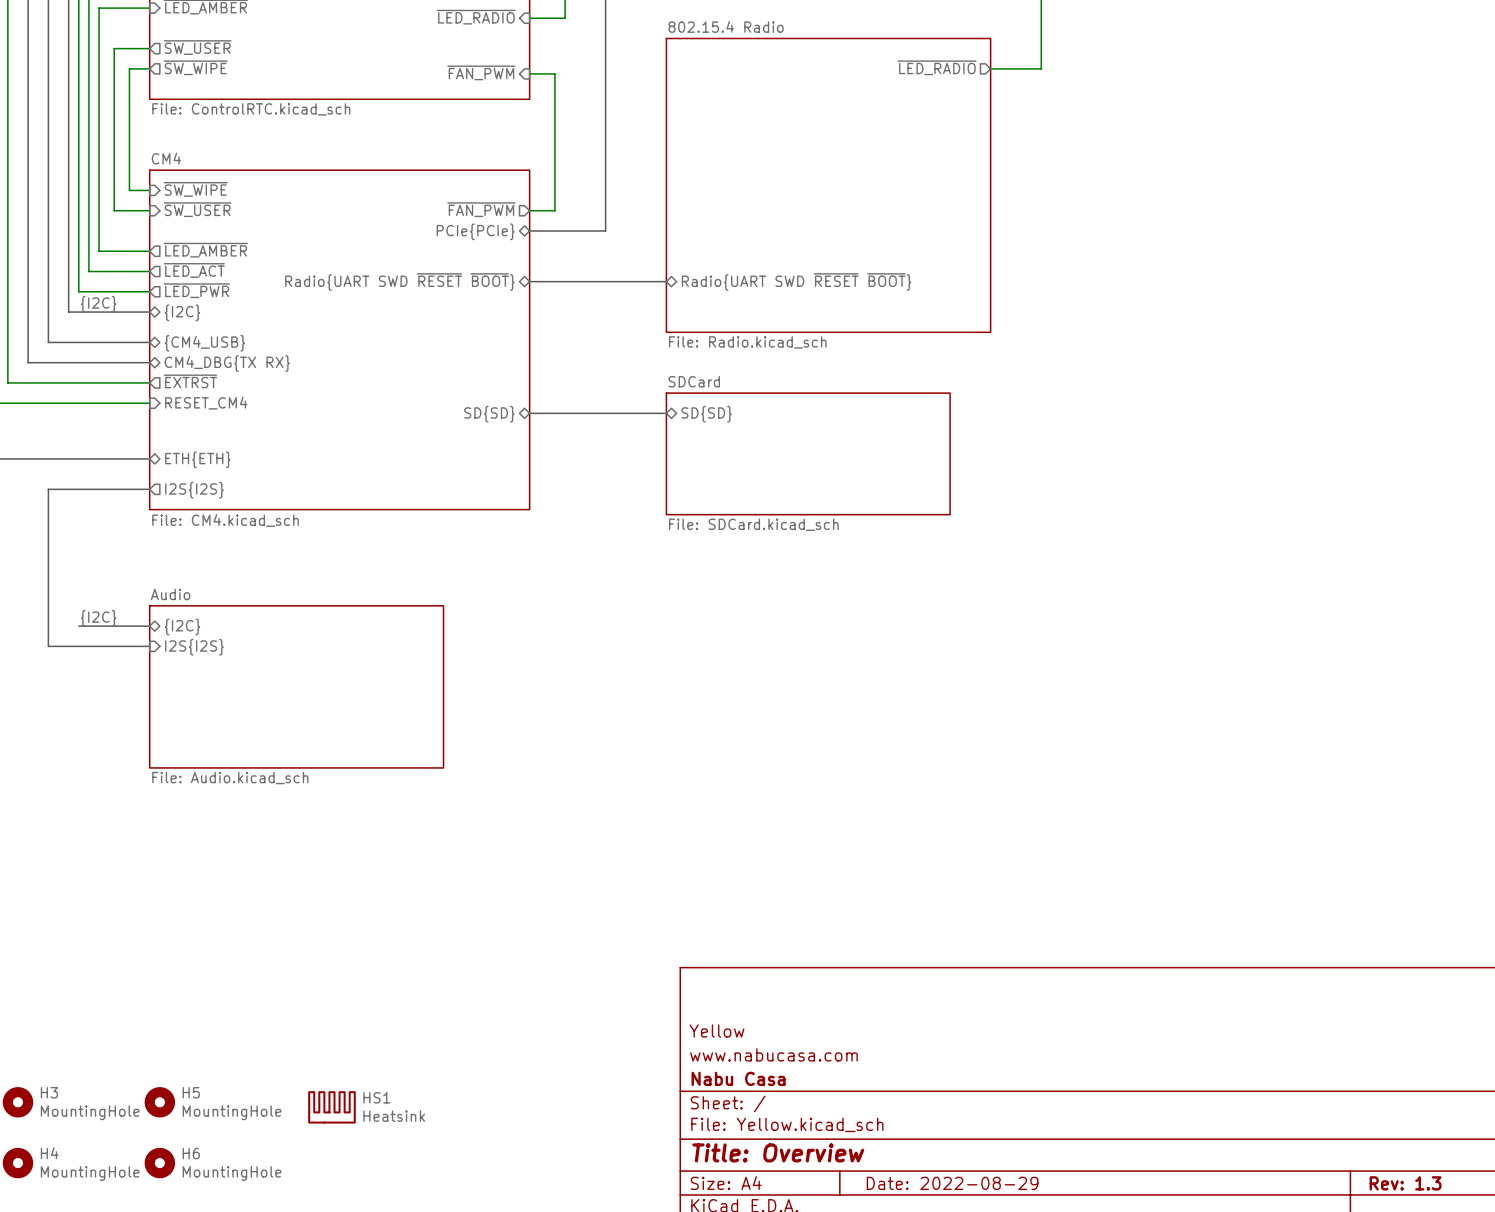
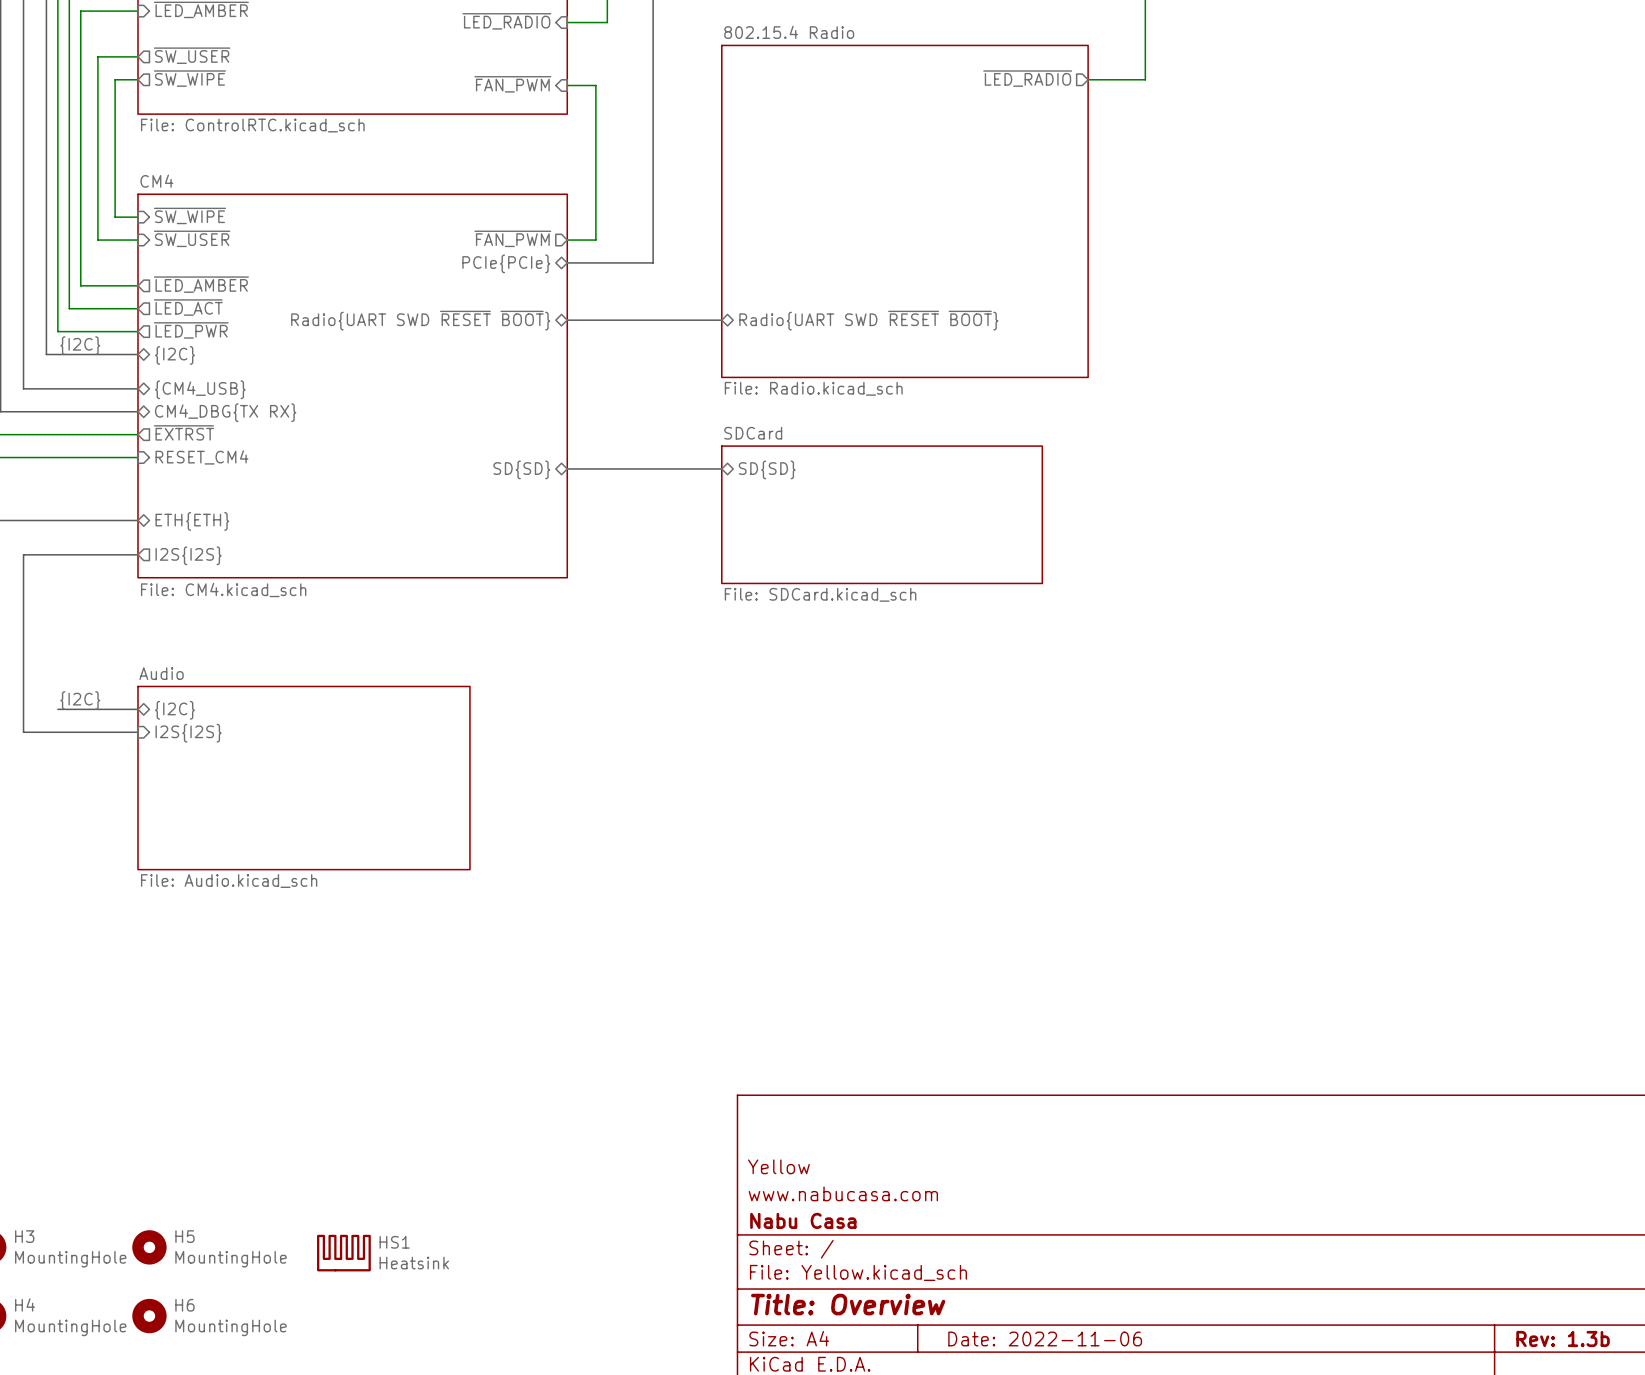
title block: Date: 2022-08-29 (952, 1183) -> Date: 2022-11-06 (1045, 1338)
title block: Rev: 1.3 (1405, 1183) -> Rev: 1.3b (1563, 1338)

